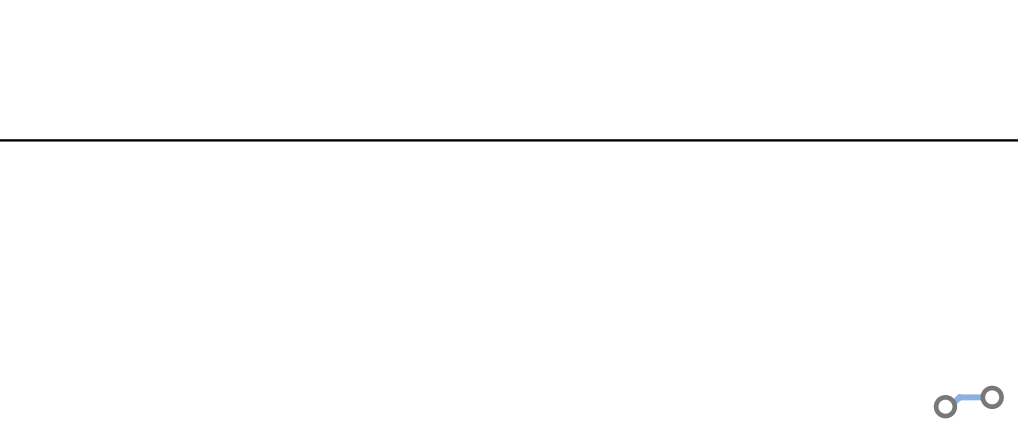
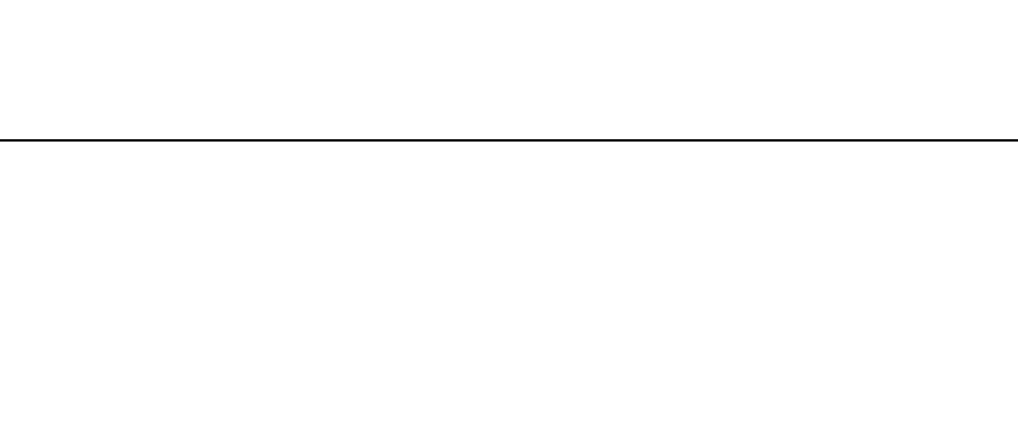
track: (992, 397) (959, 397) (950, 406) -> none
via: (992, 397) -> none
via: (945, 406) -> none

